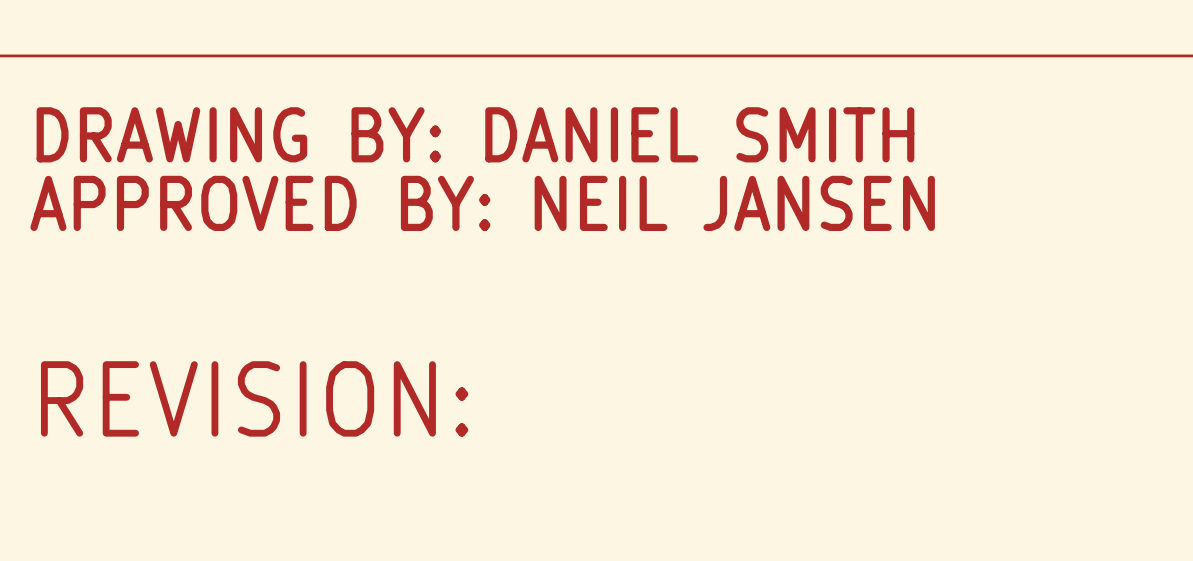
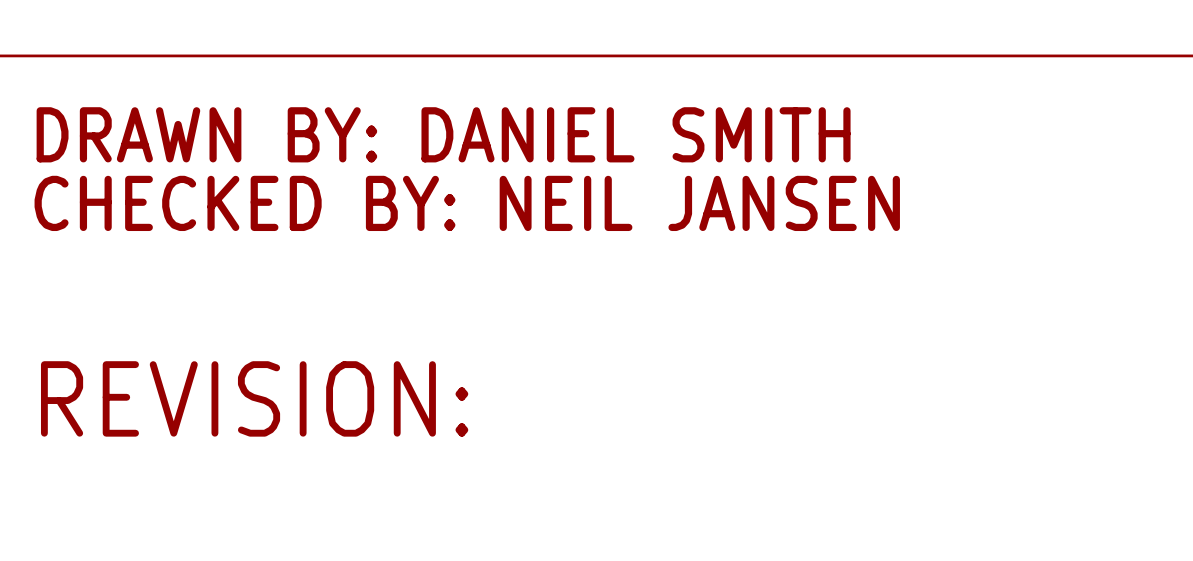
text: DRAWING BY: DANIEL SMITH (475, 134) -> DRAWN BY: DANIEL SMITH (443, 134)
text: APPROVED BY: NEIL JANSEN (482, 203) -> CHECKED BY: NEIL JANSEN (467, 203)

